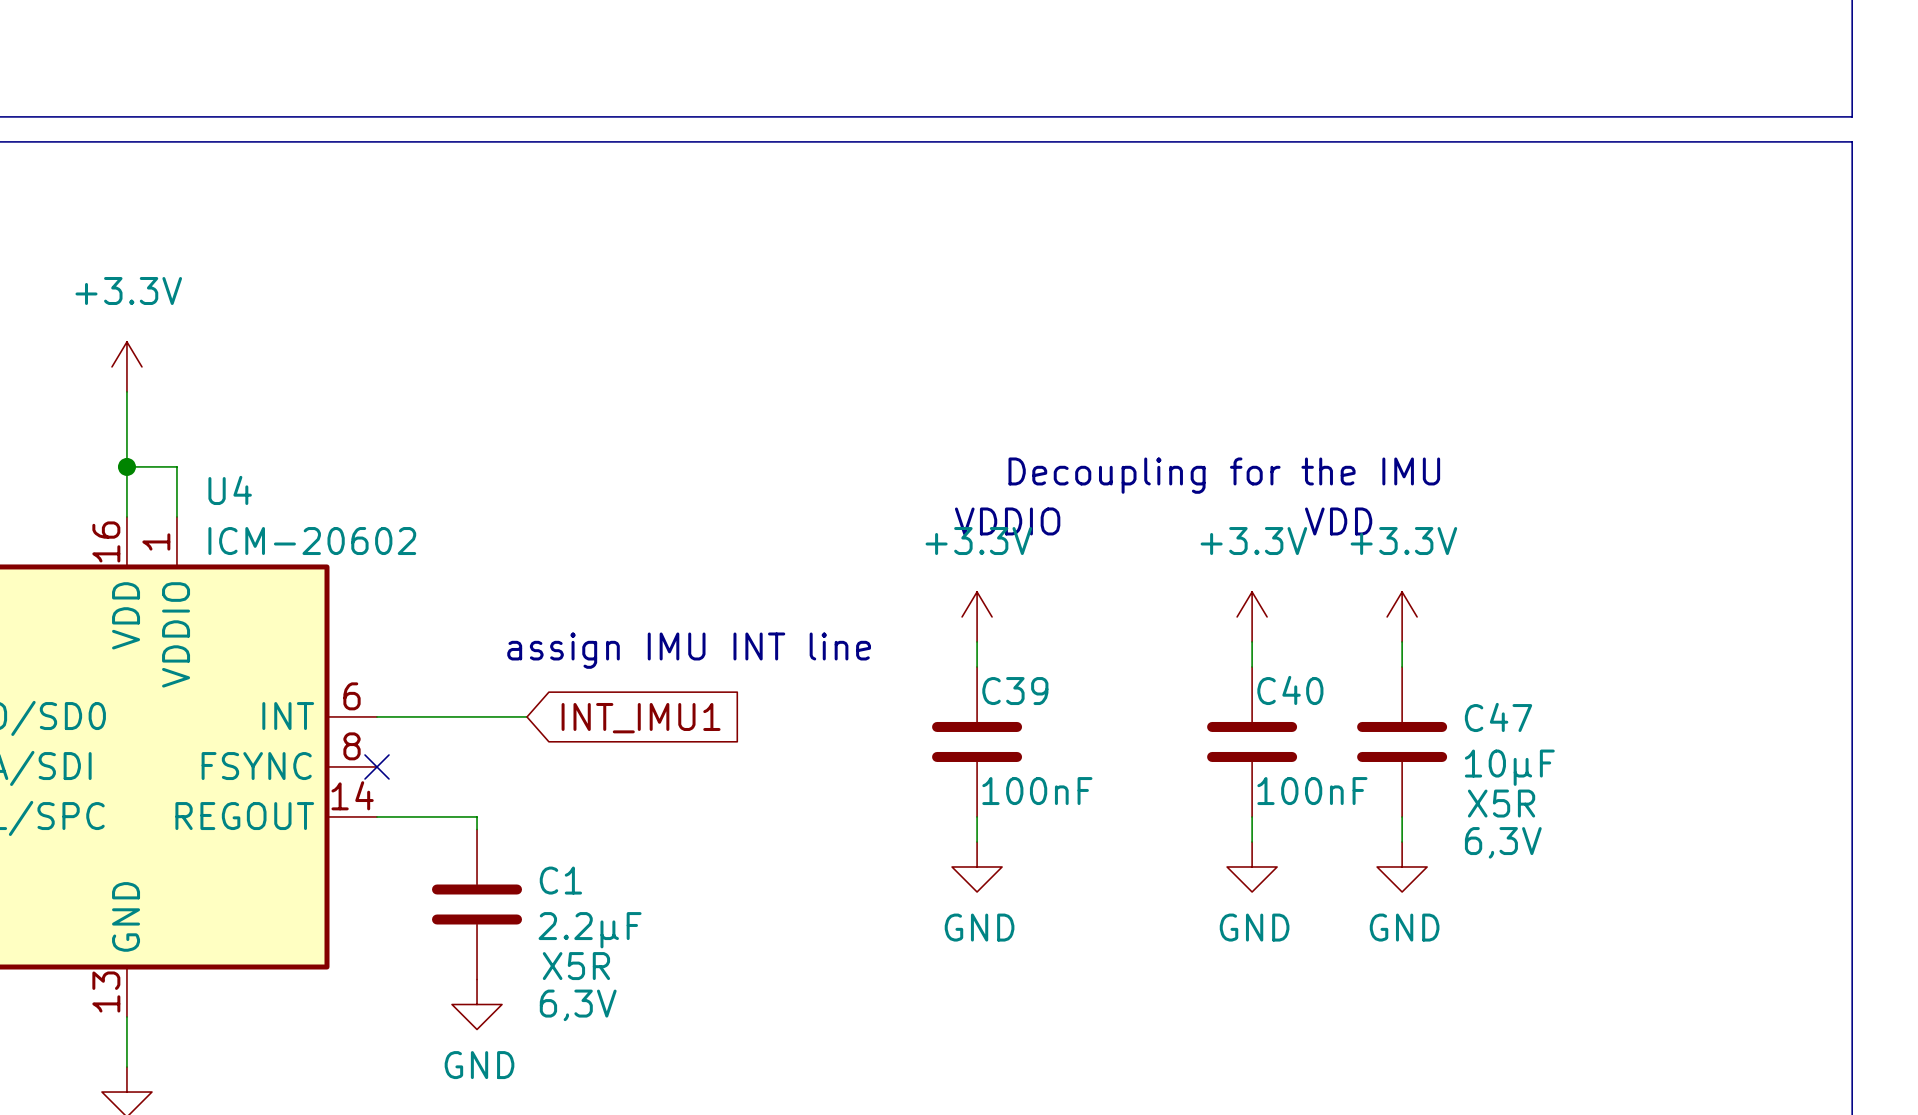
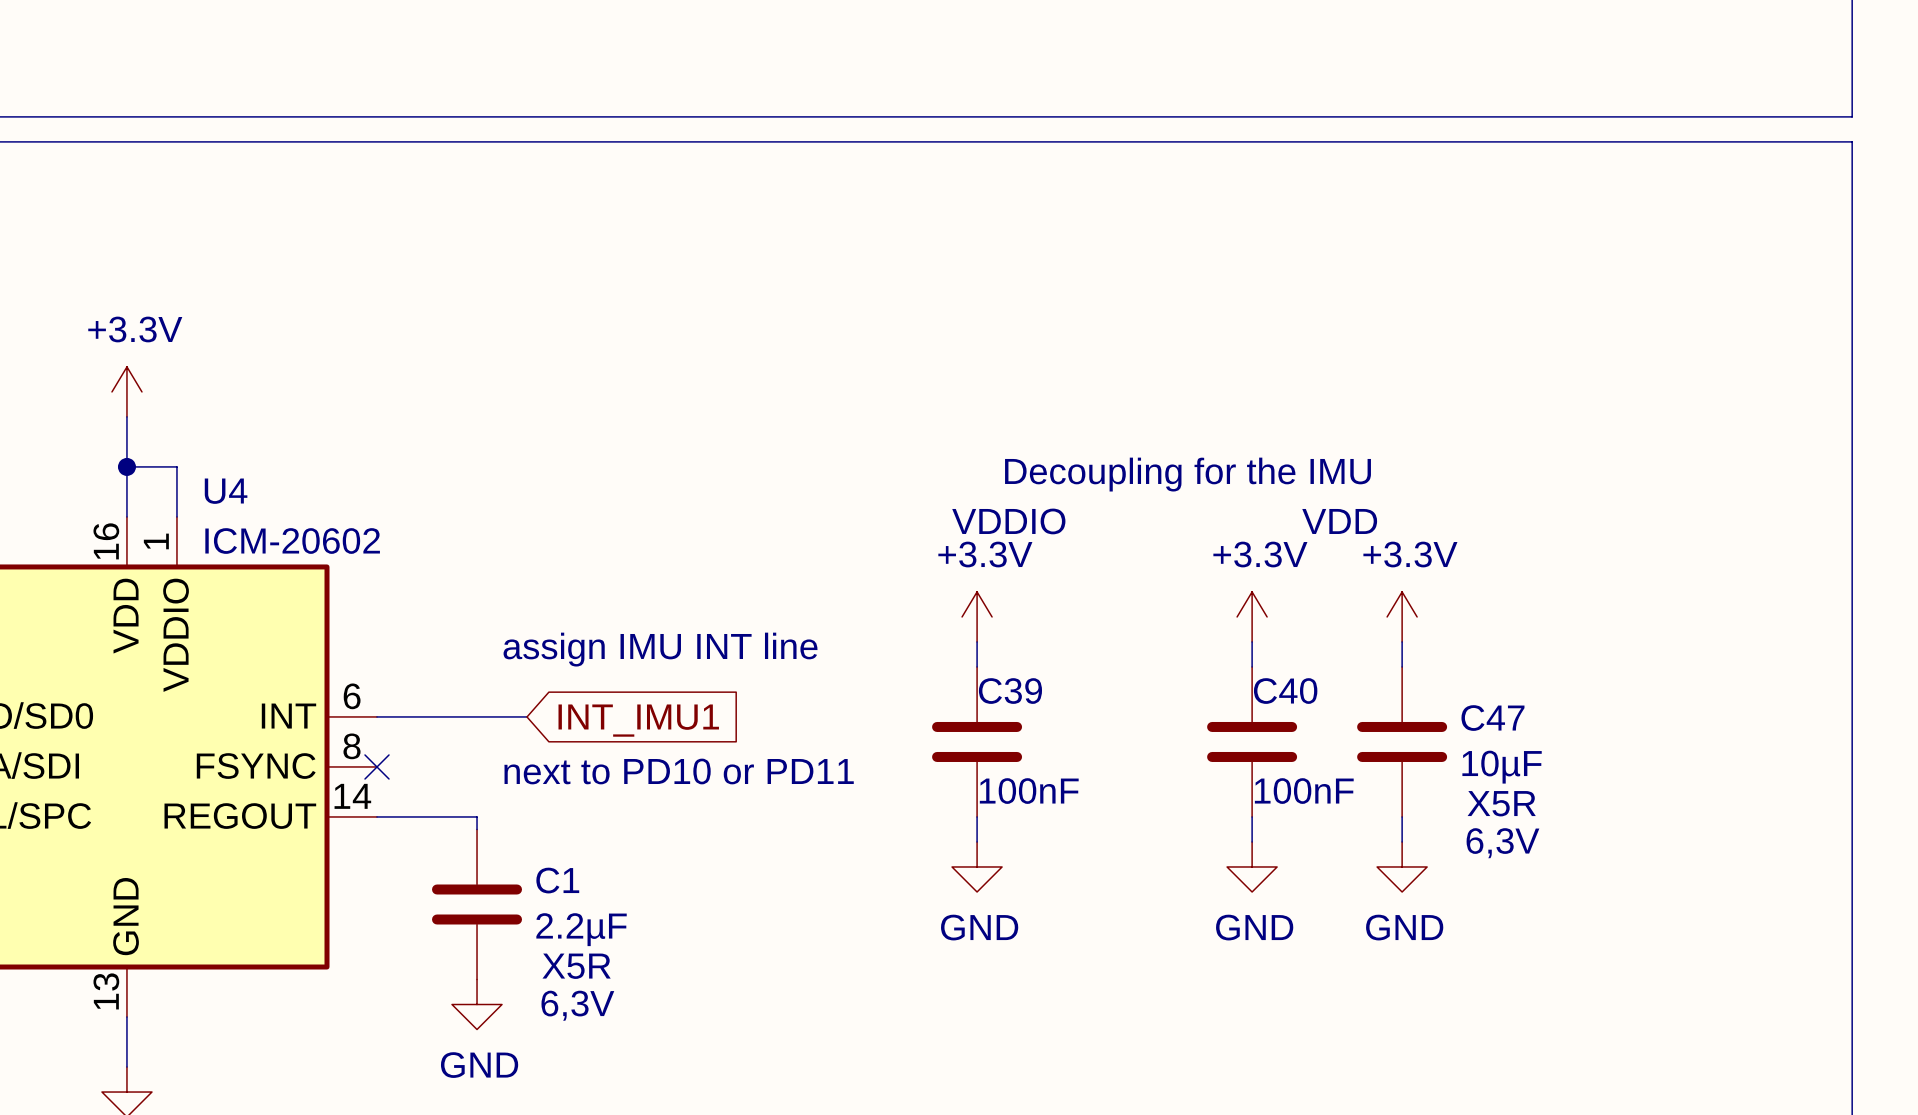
power symbol text position: +3.3V (128, 290) -> +3.3V (135, 329)
power symbol position: +3.3V (126, 366) -> +3.3V (126, 391)
power symbol text position: +3.3V (978, 541) -> +3.3V (985, 554)
power symbol text position: +3.3V (1253, 541) -> +3.3V (1260, 554)
power symbol text position: +3.3V (1403, 541) -> +3.3V (1410, 554)
text: none -> next to PD10 or PD11 (679, 771)

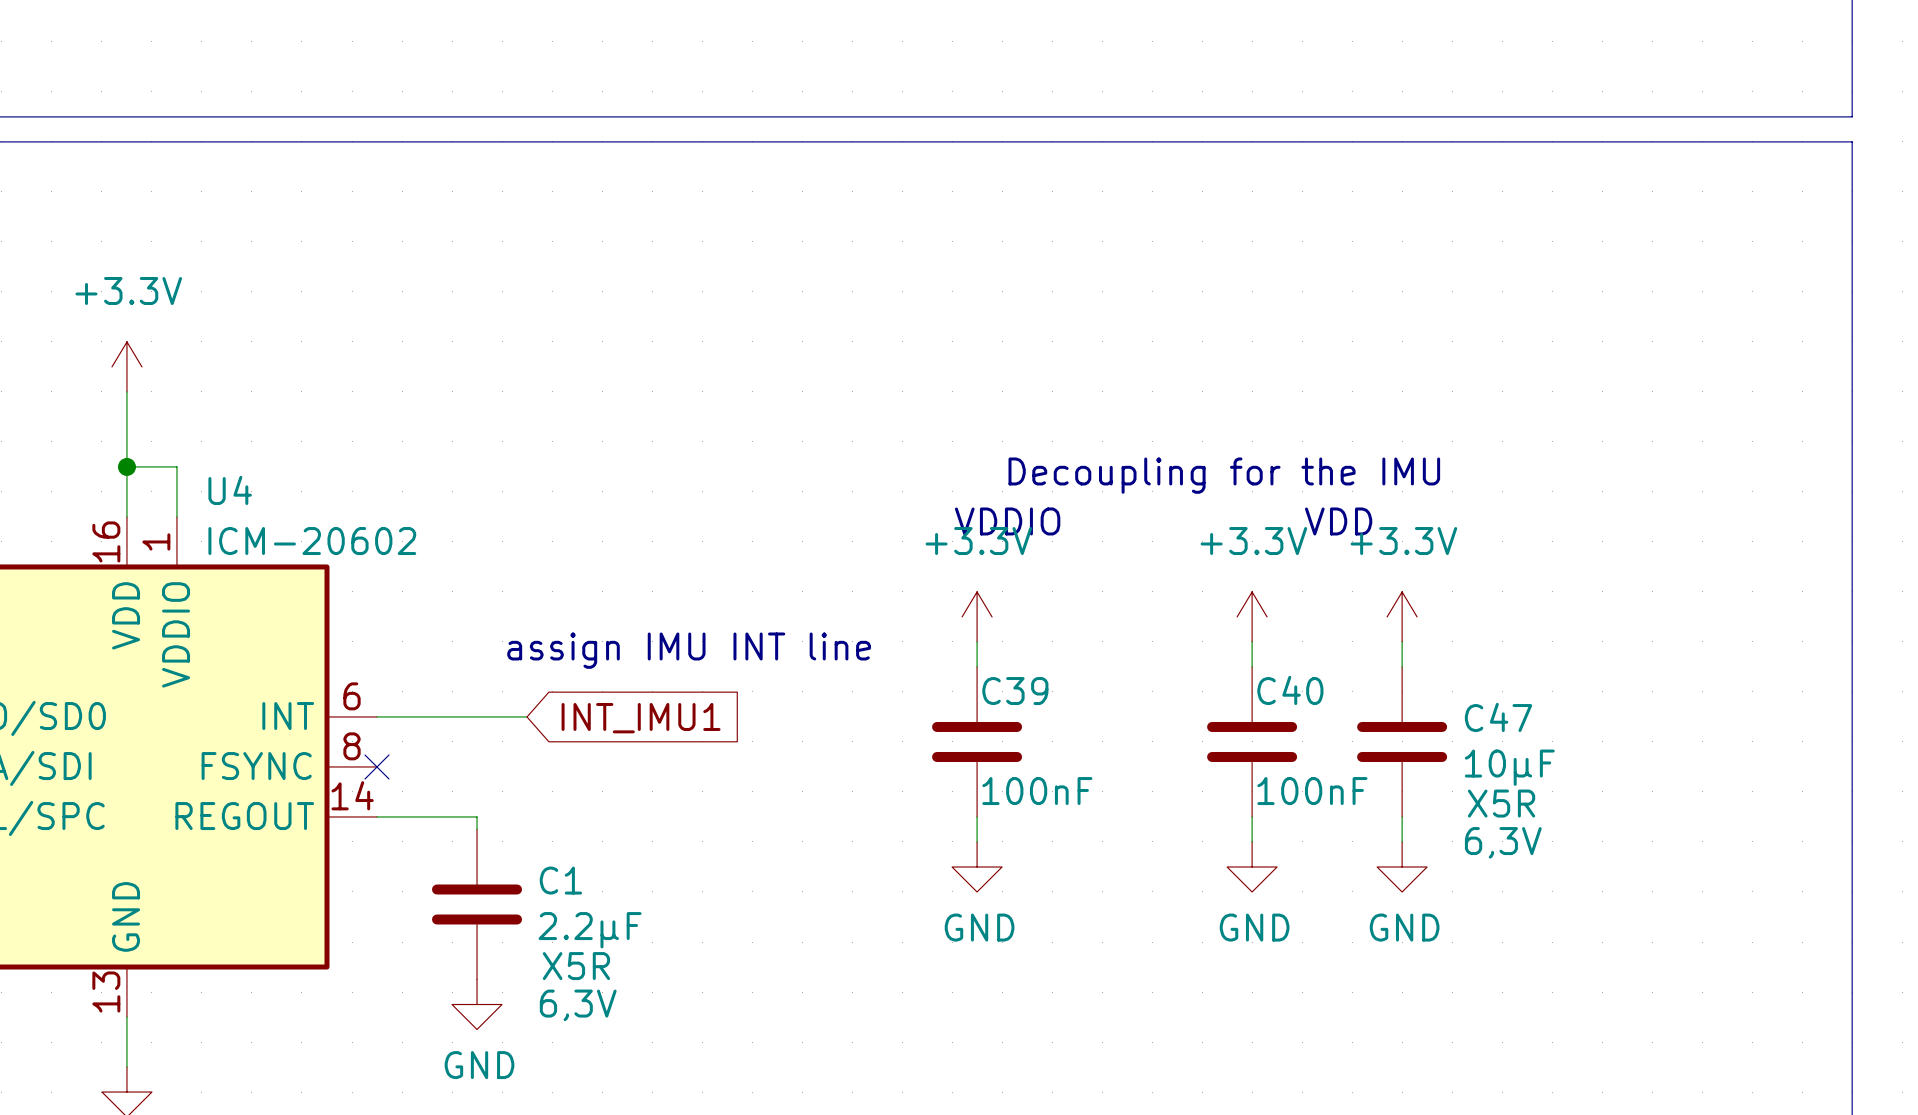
power symbol text position: +3.3V (135, 329) -> +3.3V (128, 290)
power symbol position: +3.3V (126, 391) -> +3.3V (126, 366)
power symbol text position: +3.3V (985, 554) -> +3.3V (978, 541)
power symbol text position: +3.3V (1260, 554) -> +3.3V (1253, 541)
power symbol text position: +3.3V (1410, 554) -> +3.3V (1403, 541)
text: next to PD10 or PD11 (679, 771) -> none

